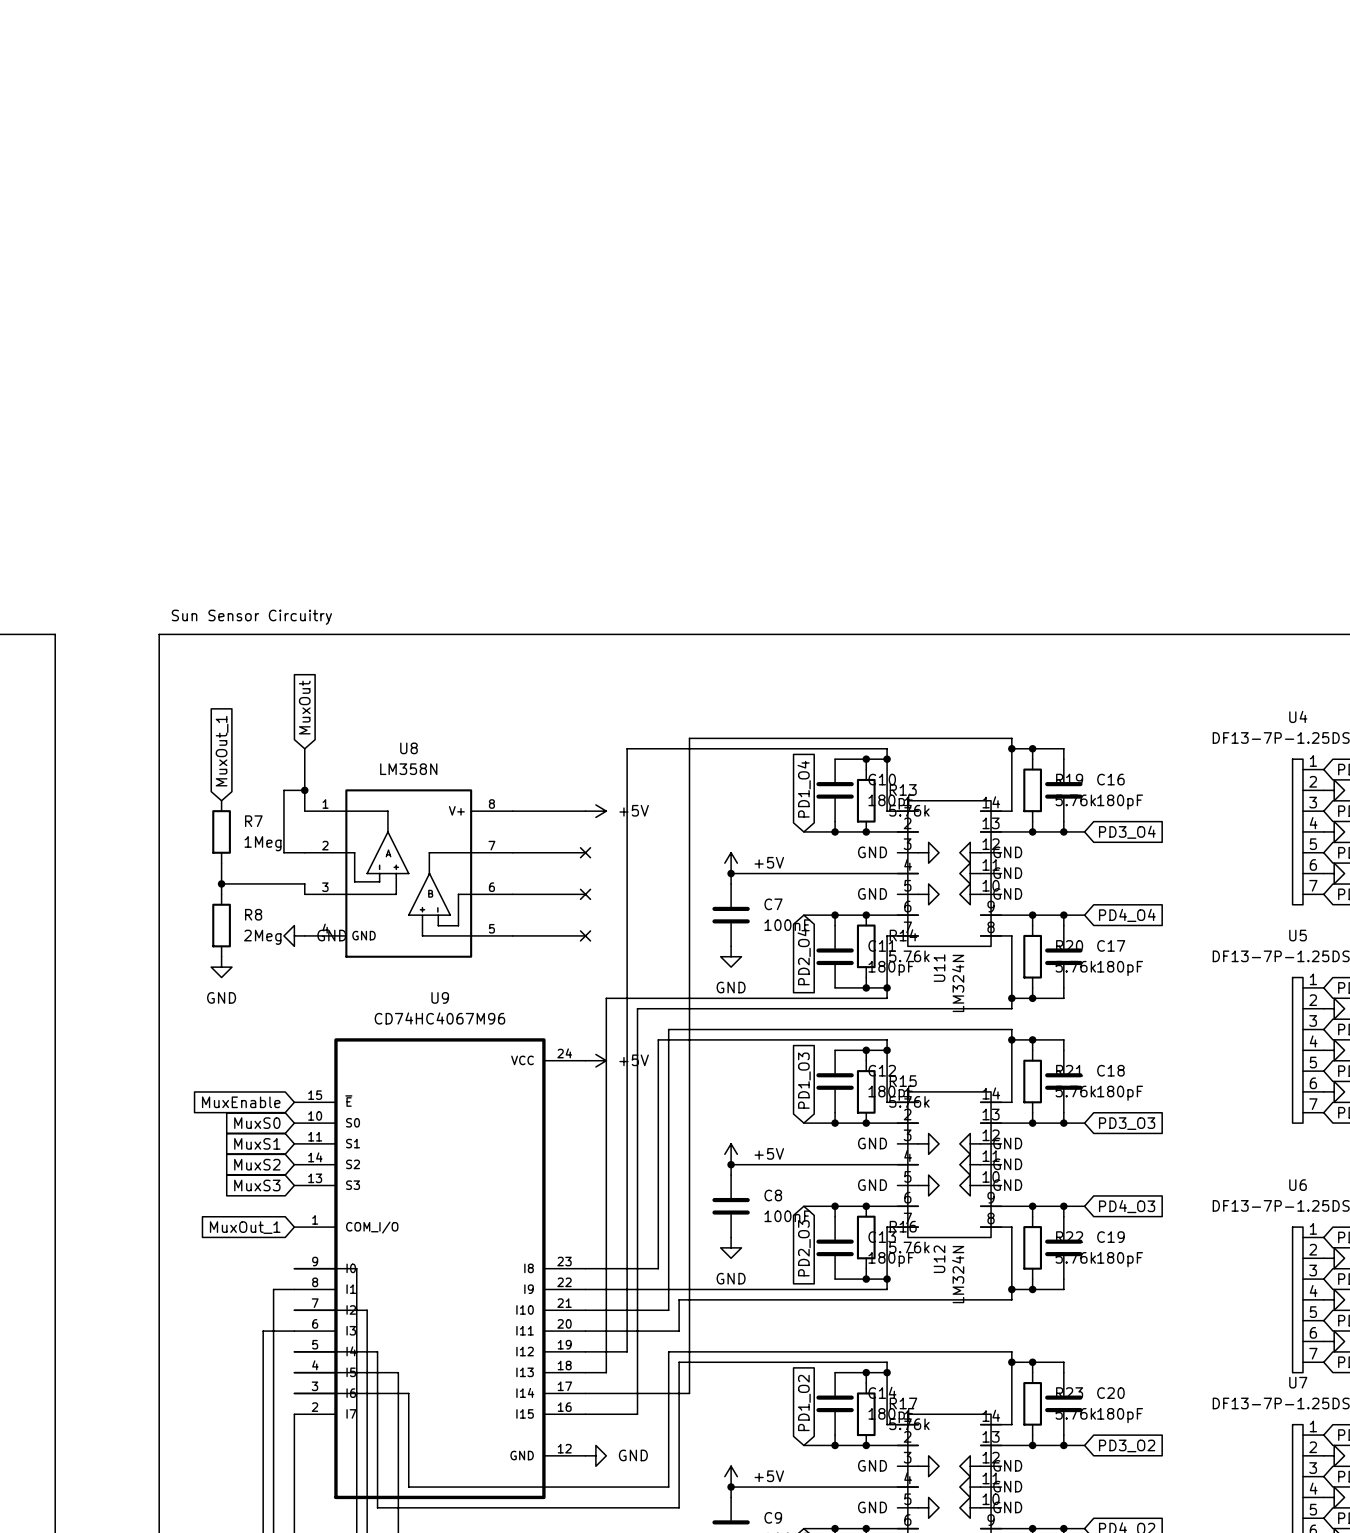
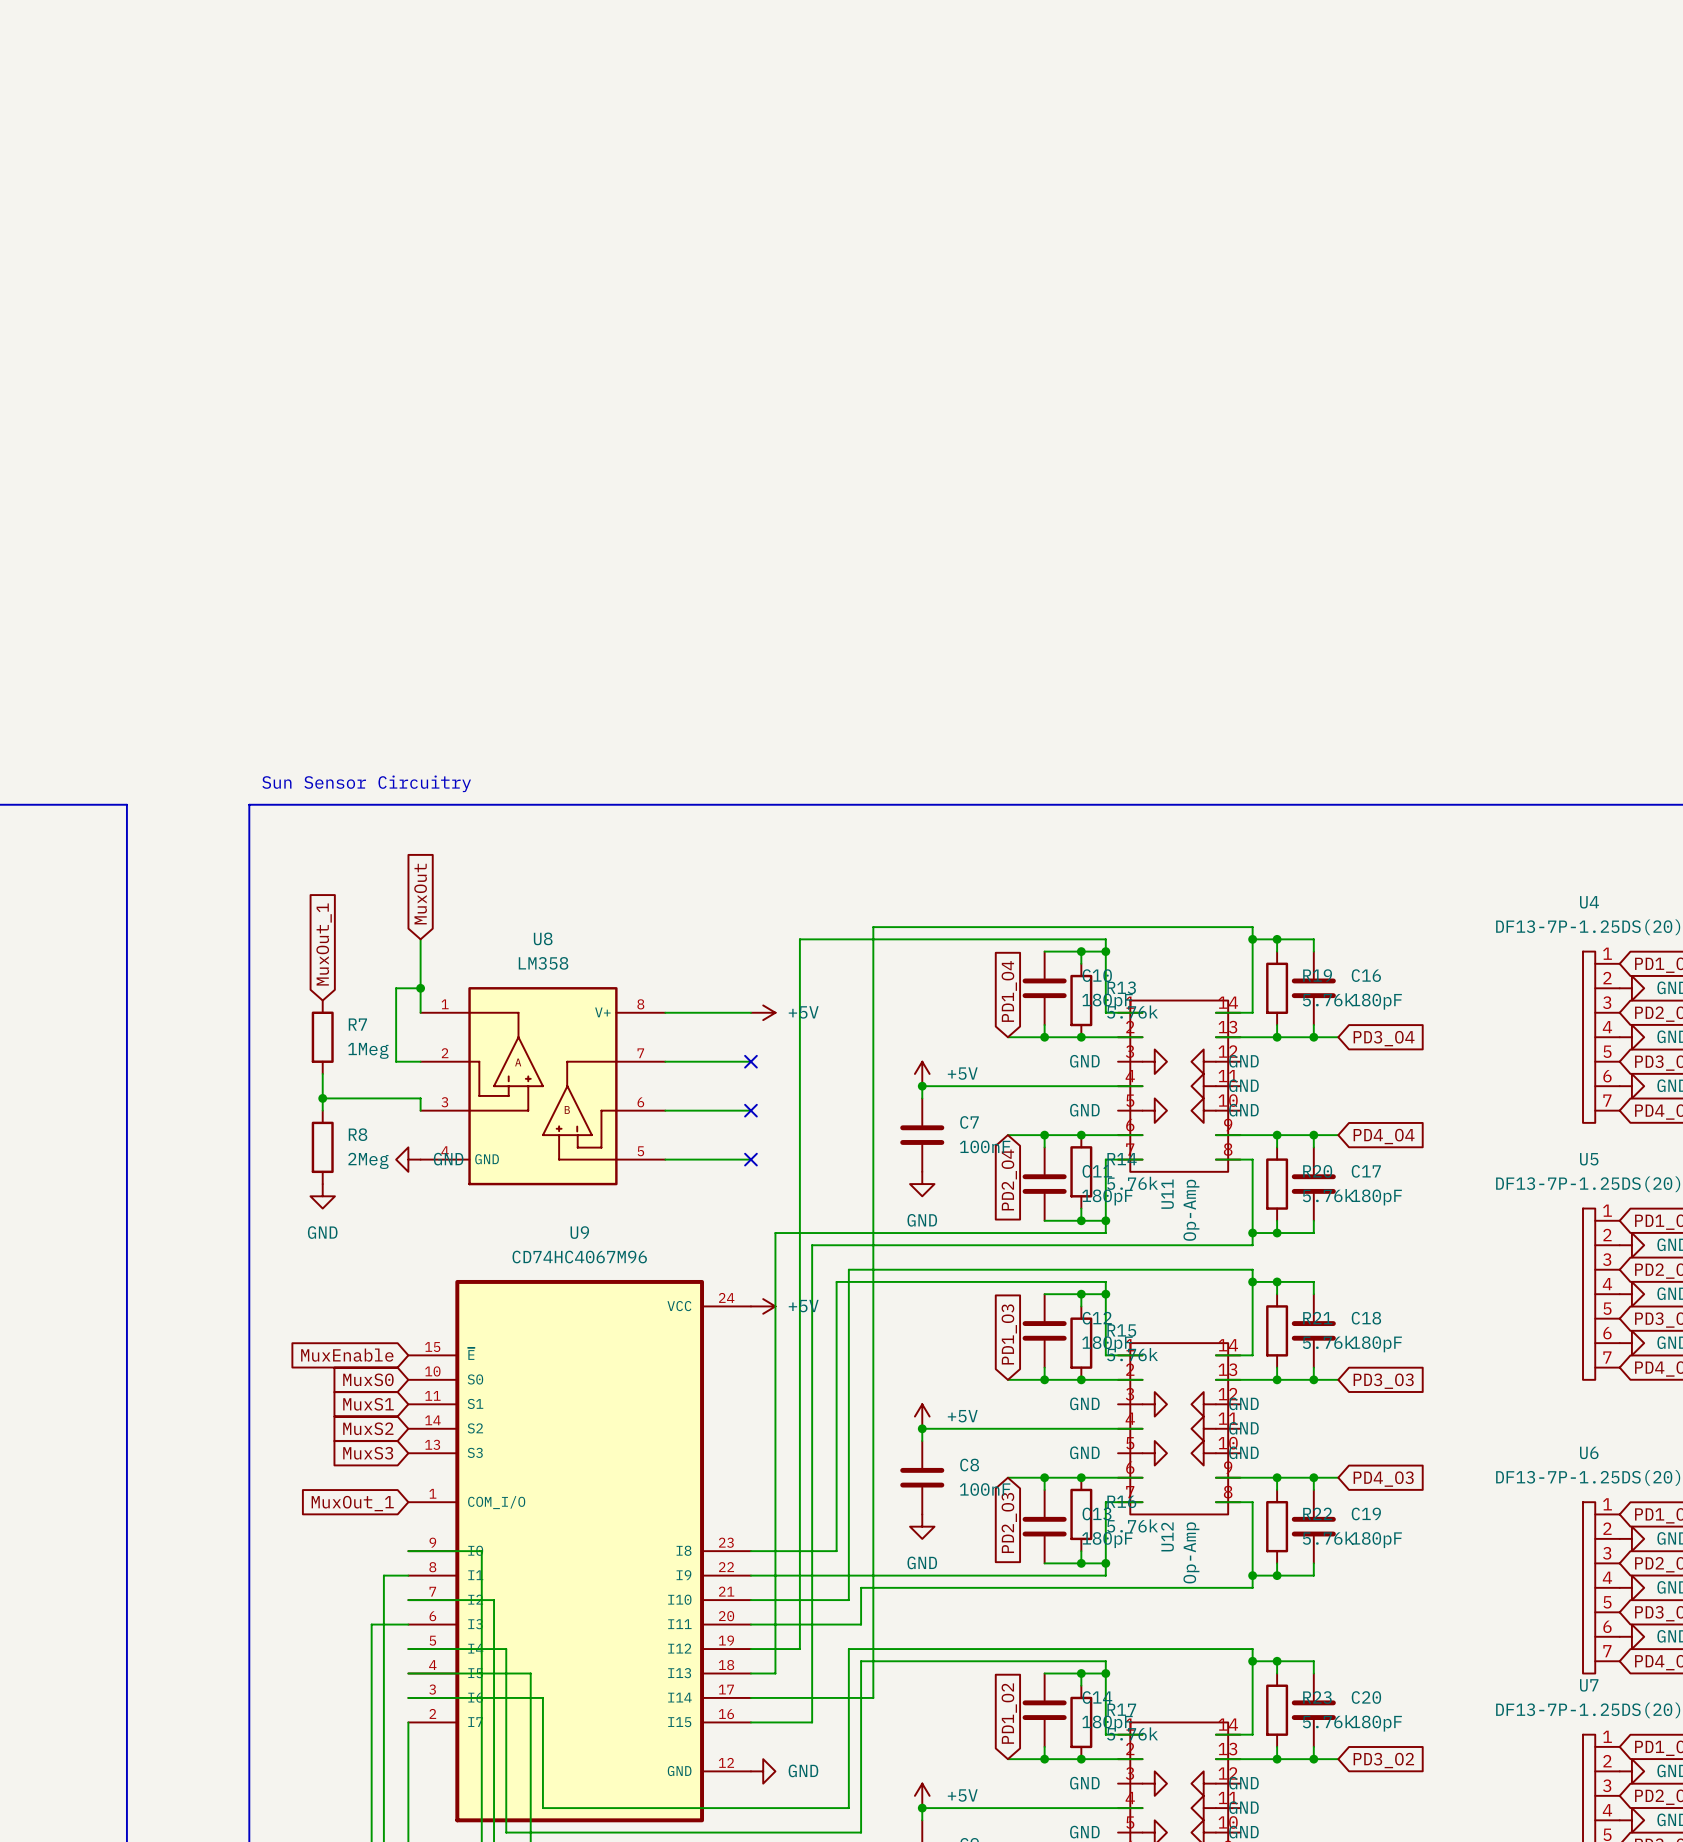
U8 value: LM358N (408, 769) -> LM358 (543, 963)
U11 value: LM324N (958, 983) -> Op-Amp (1191, 1210)
U12 value: LM324N (958, 1274) -> Op-Amp (1191, 1552)

